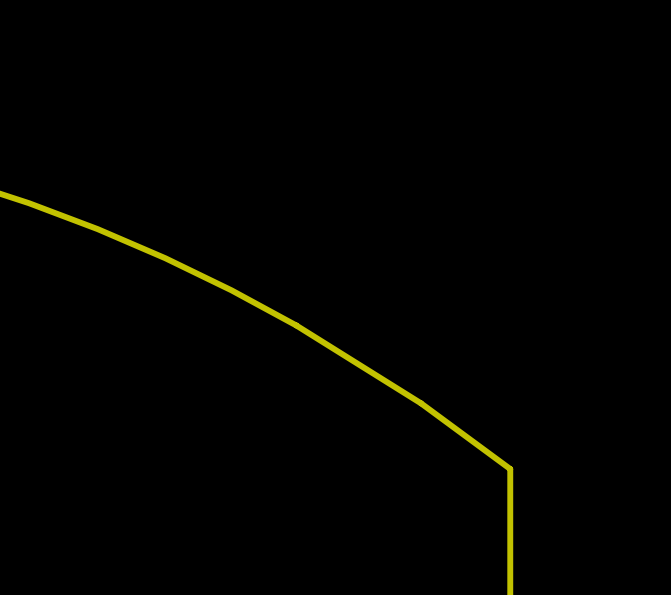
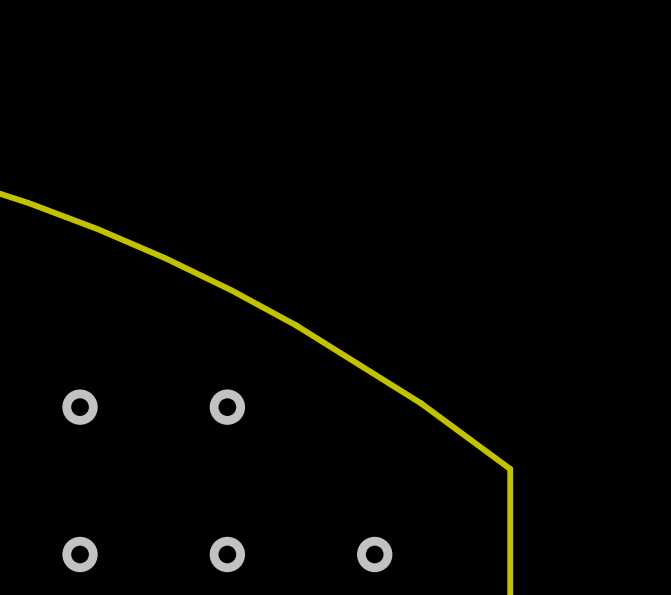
via: none -> (80, 407)
via: none -> (227, 407)
via: none -> (80, 554)
via: none -> (227, 554)
via: none -> (374, 554)

